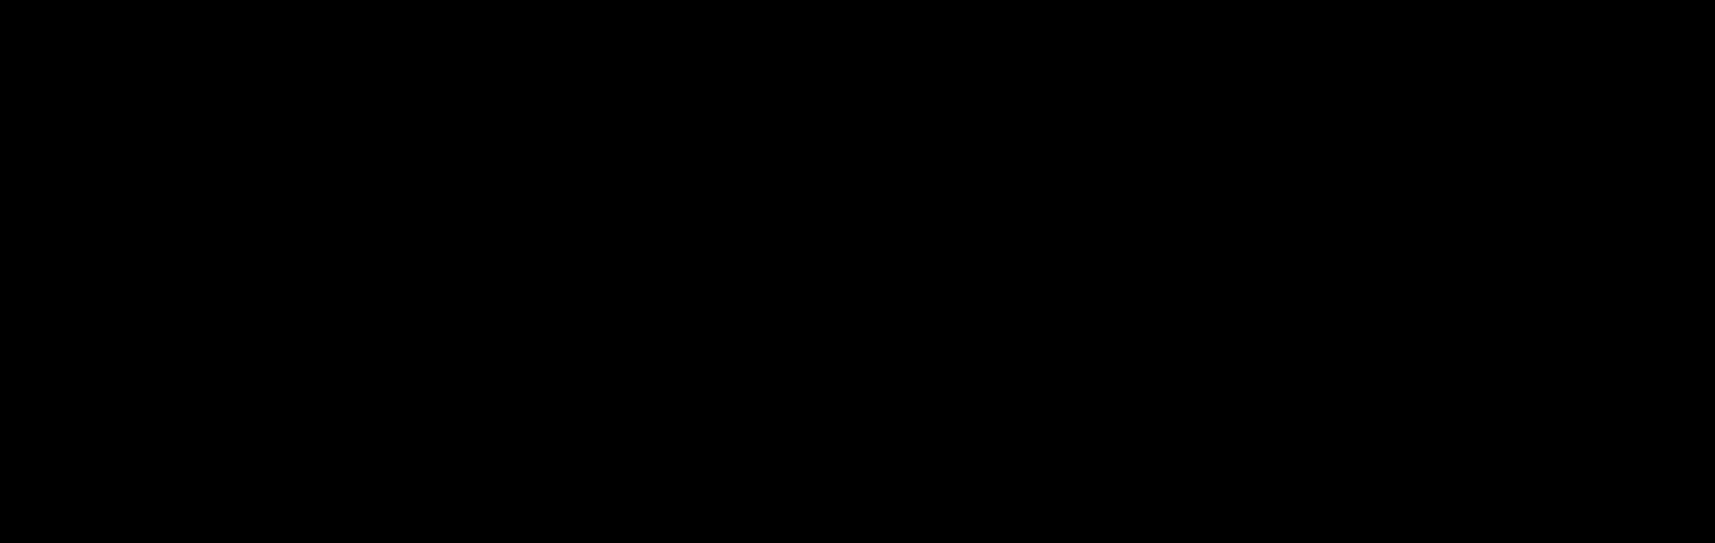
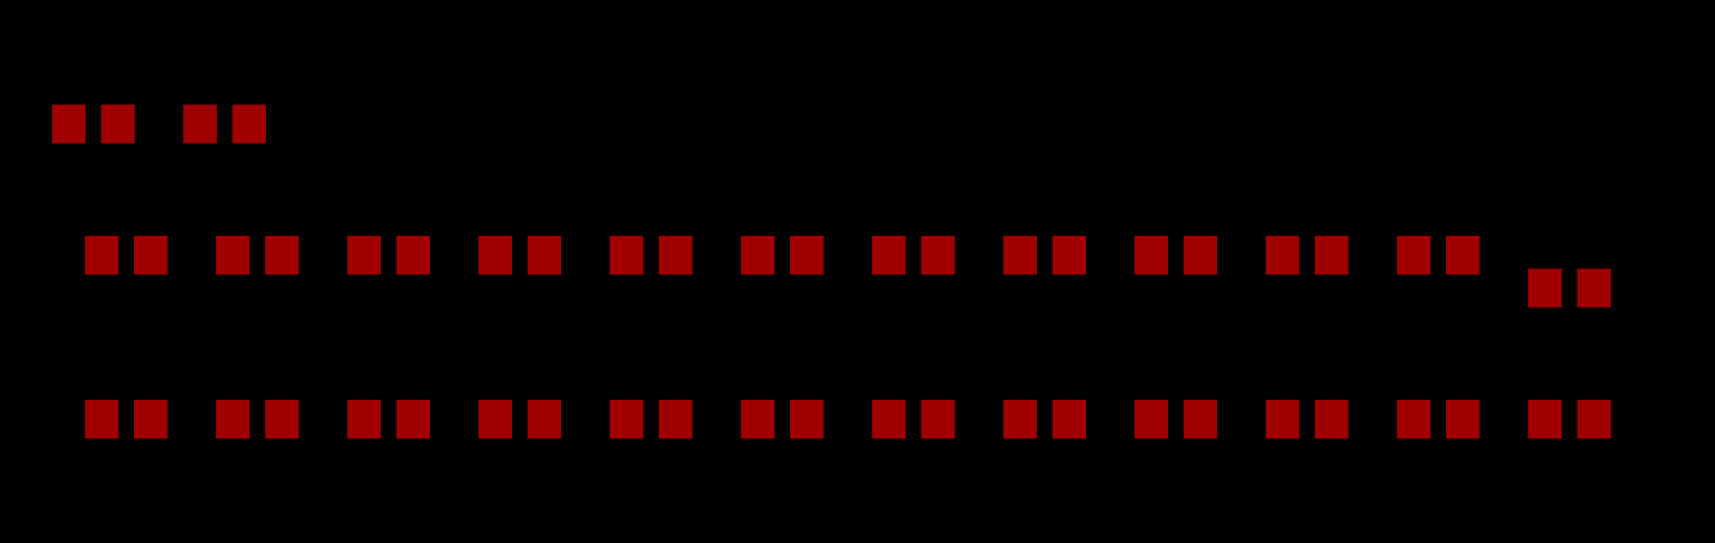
part: none -> (93, 124)
part: none -> (224, 124)
part: none -> (126, 255)
part: none -> (257, 255)
part: none -> (388, 255)
part: none -> (519, 255)
part: none -> (651, 255)
part: none -> (782, 255)
part: none -> (913, 255)
part: none -> (1044, 255)
part: none -> (1175, 255)
part: none -> (1307, 255)
part: none -> (1438, 255)
part: none -> (1569, 288)
part: none -> (126, 419)
part: none -> (257, 419)
part: none -> (388, 419)
part: none -> (519, 419)
part: none -> (651, 419)
part: none -> (782, 419)
part: none -> (913, 419)
part: none -> (1044, 419)
part: none -> (1175, 419)
part: none -> (1307, 419)
part: none -> (1438, 419)
part: none -> (1569, 419)

